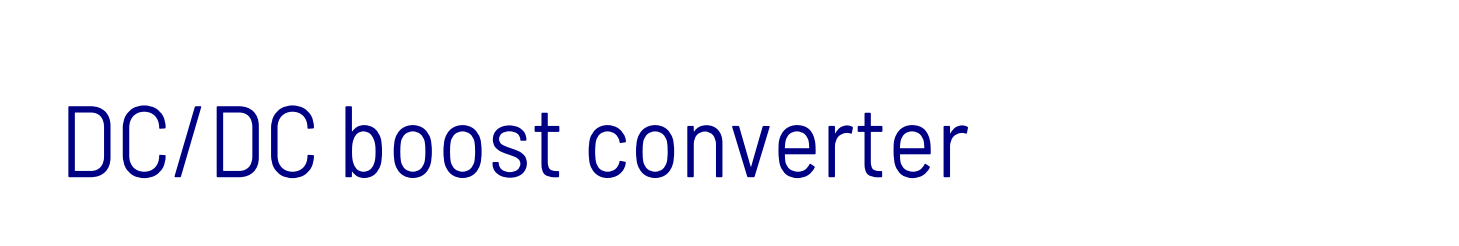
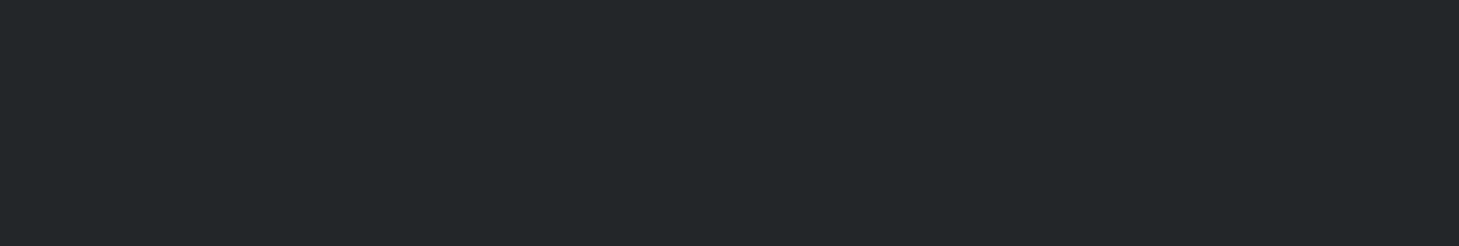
text: DC/DC boost converter (518, 141) -> none

